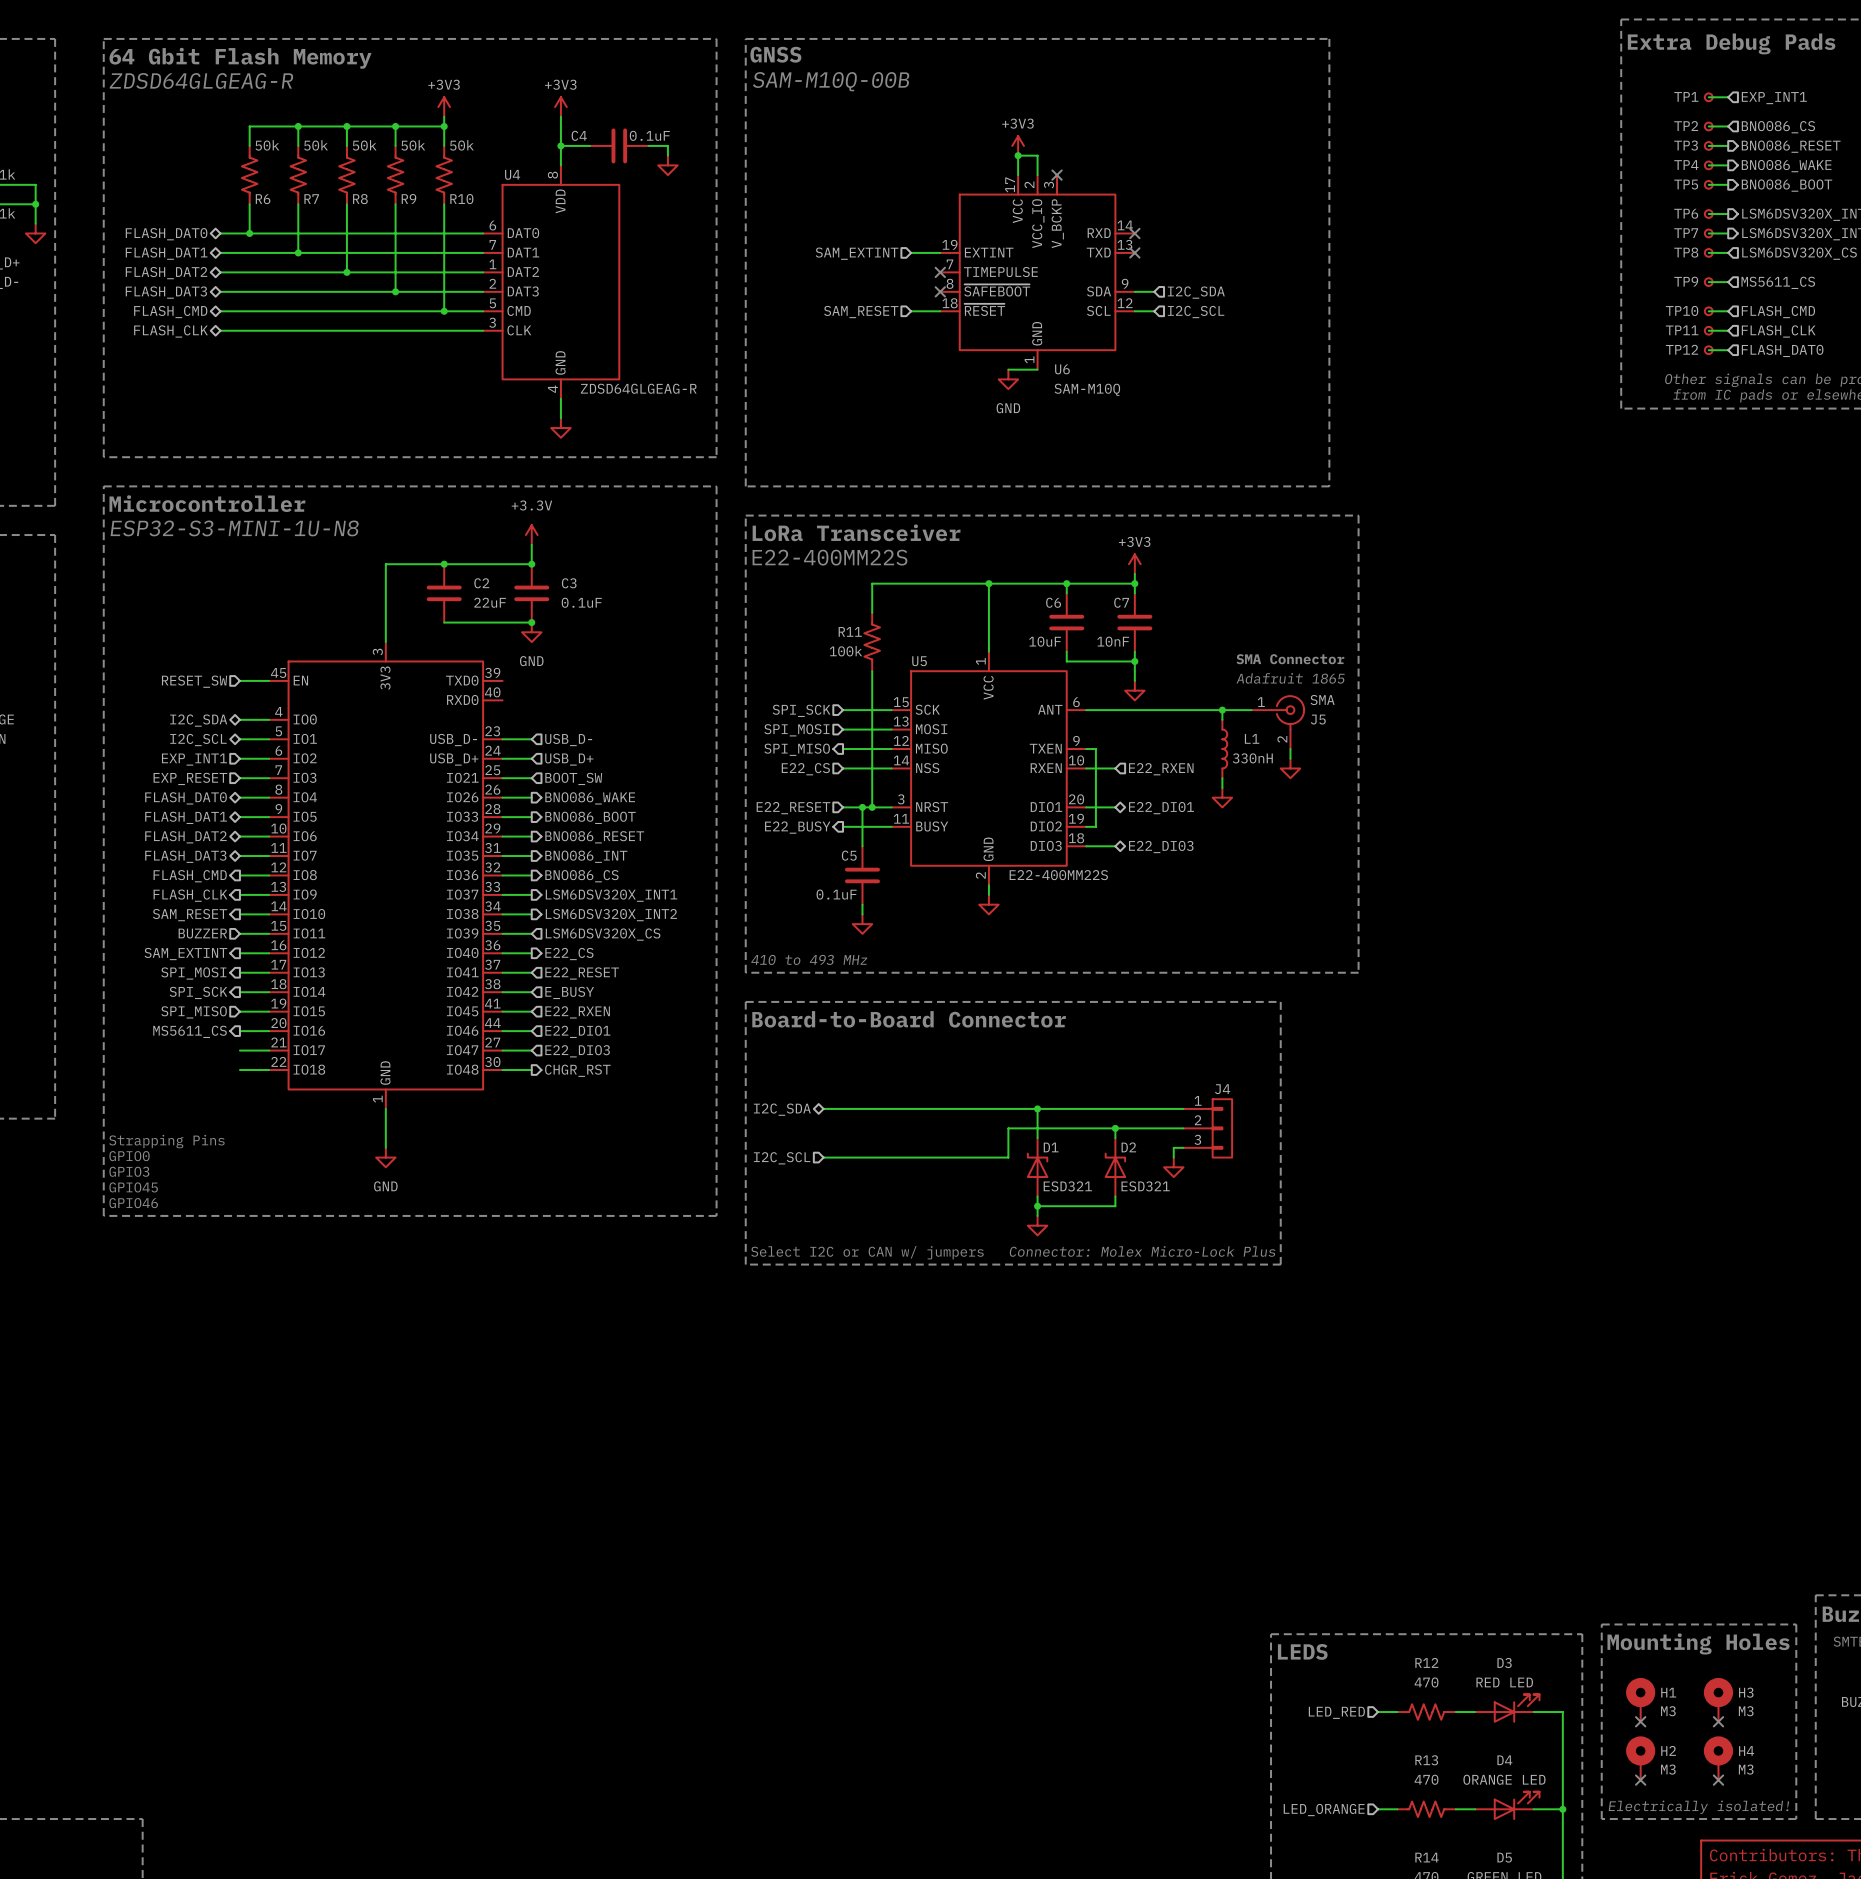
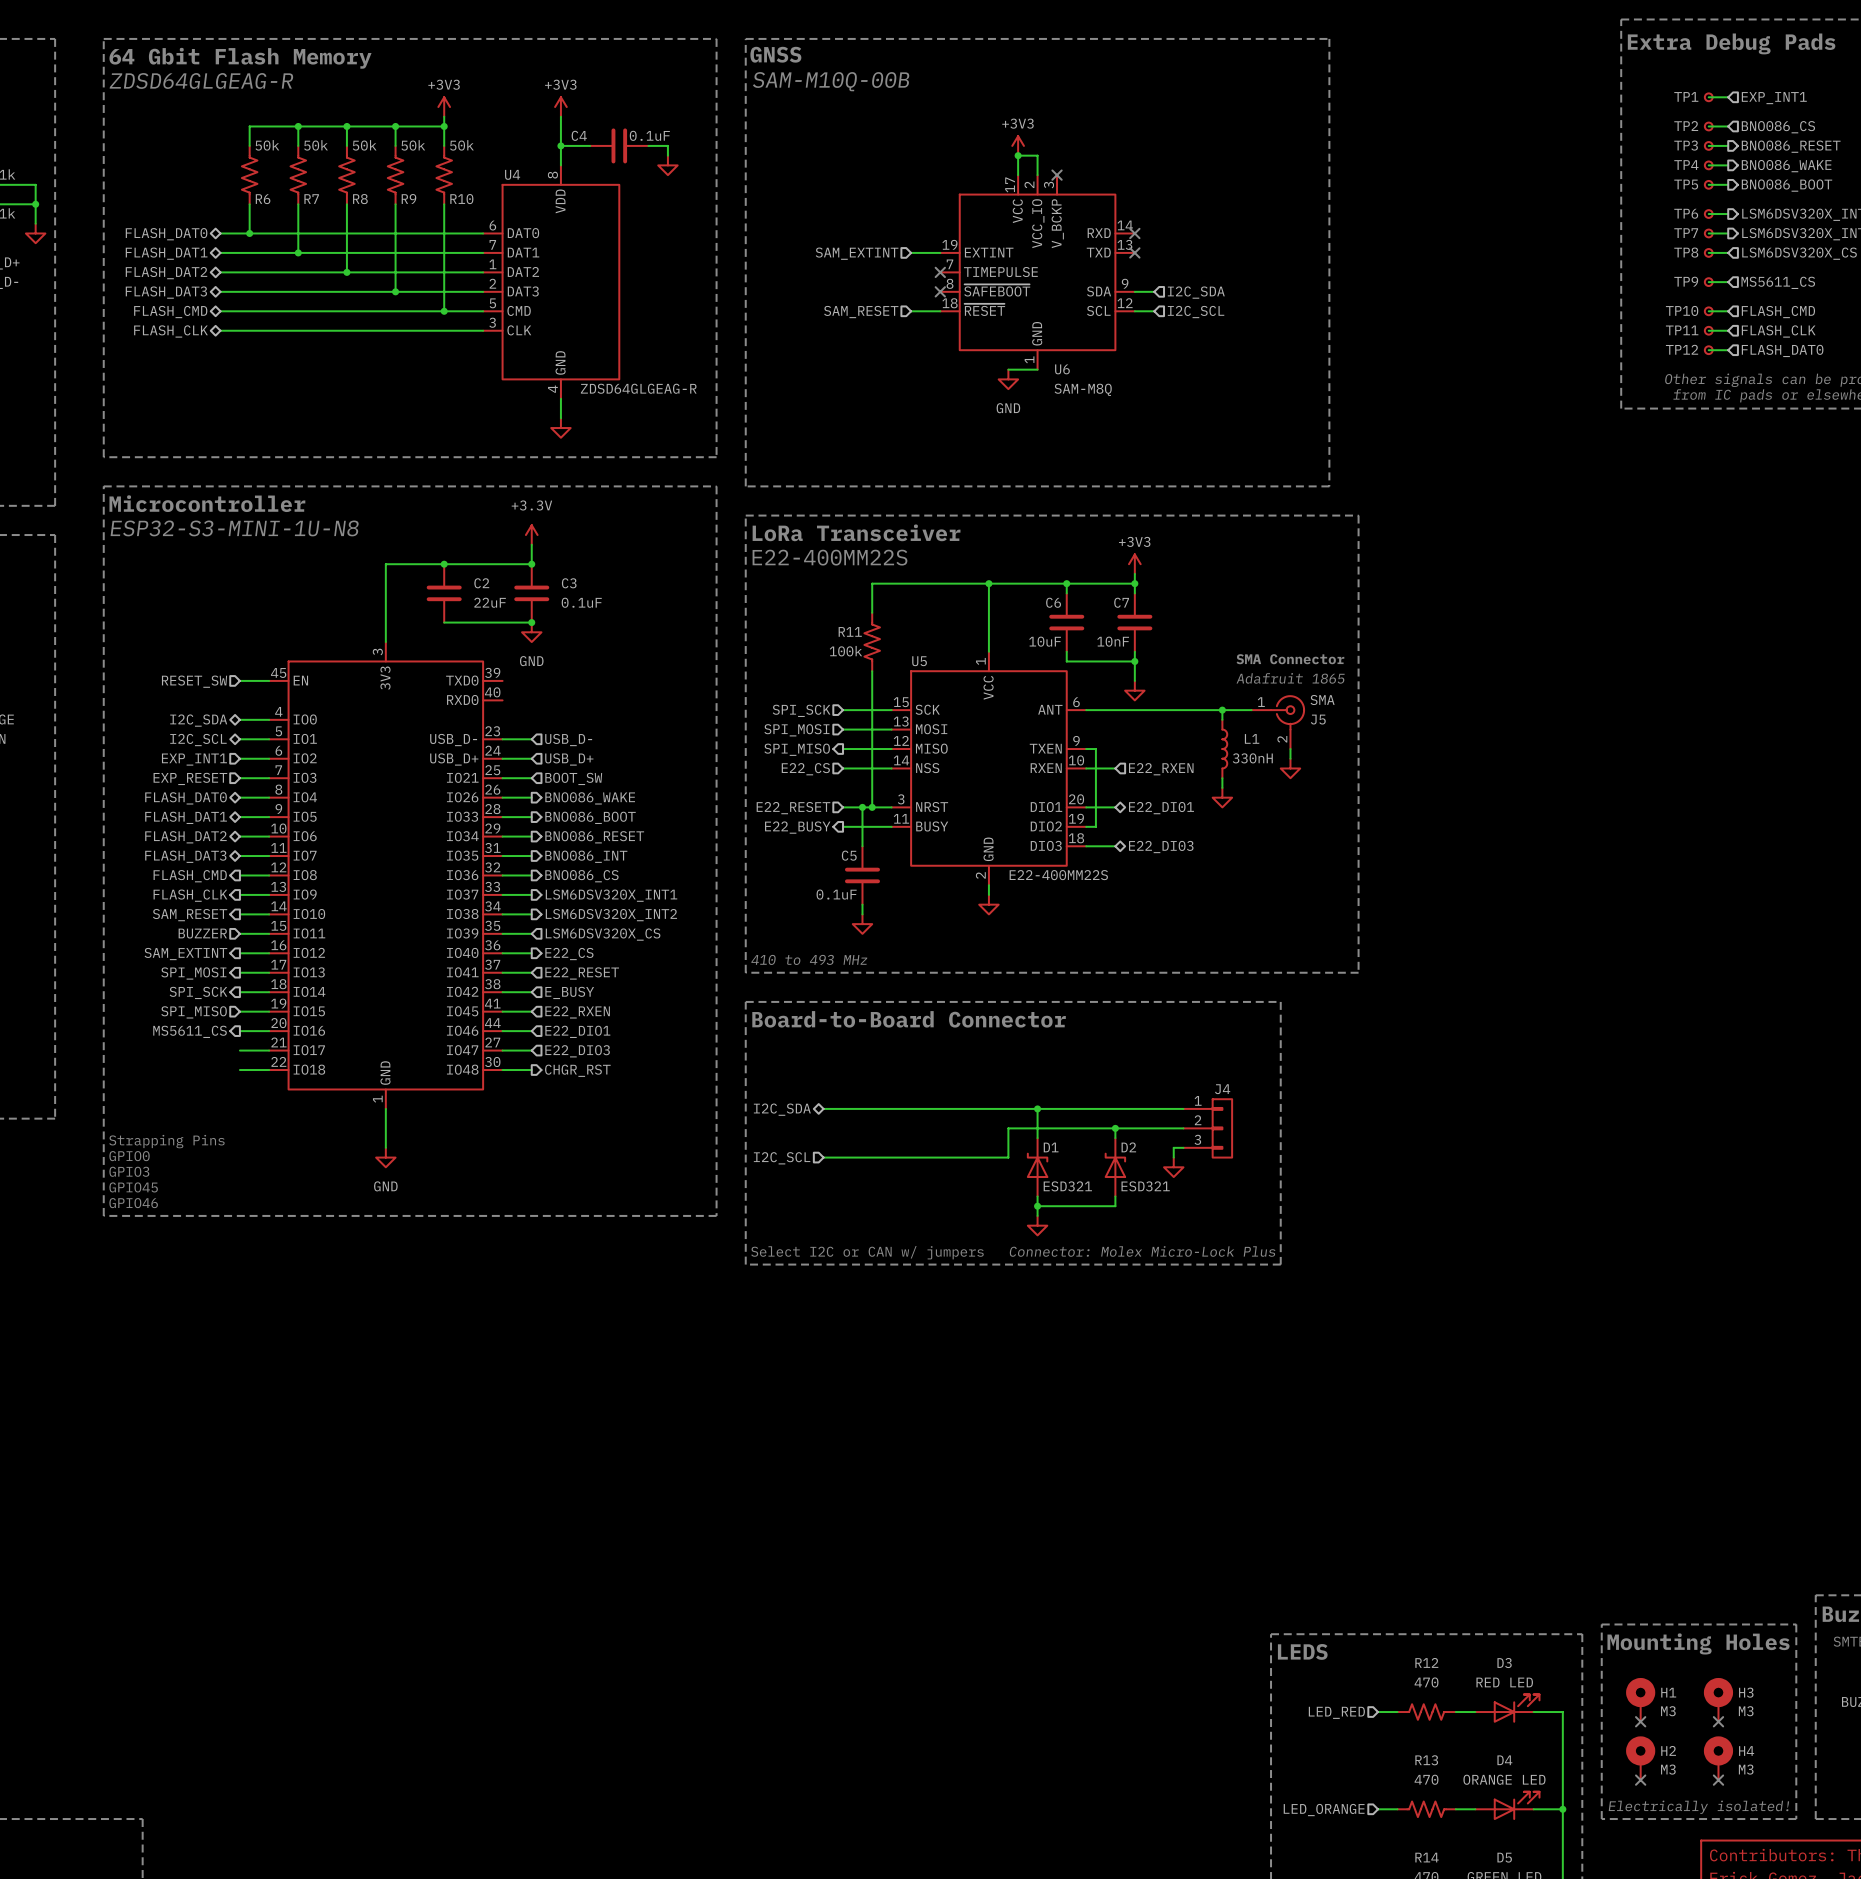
U6 value: SAM-M10Q (1087, 389) -> SAM-M8Q (1083, 389)

